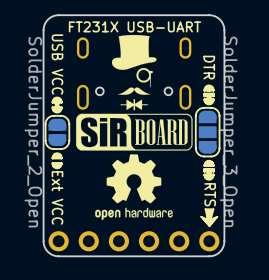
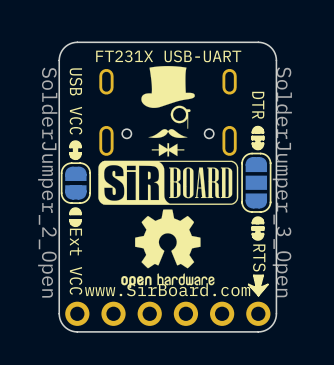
text: none -> www.SirBoard.com (167, 289)

